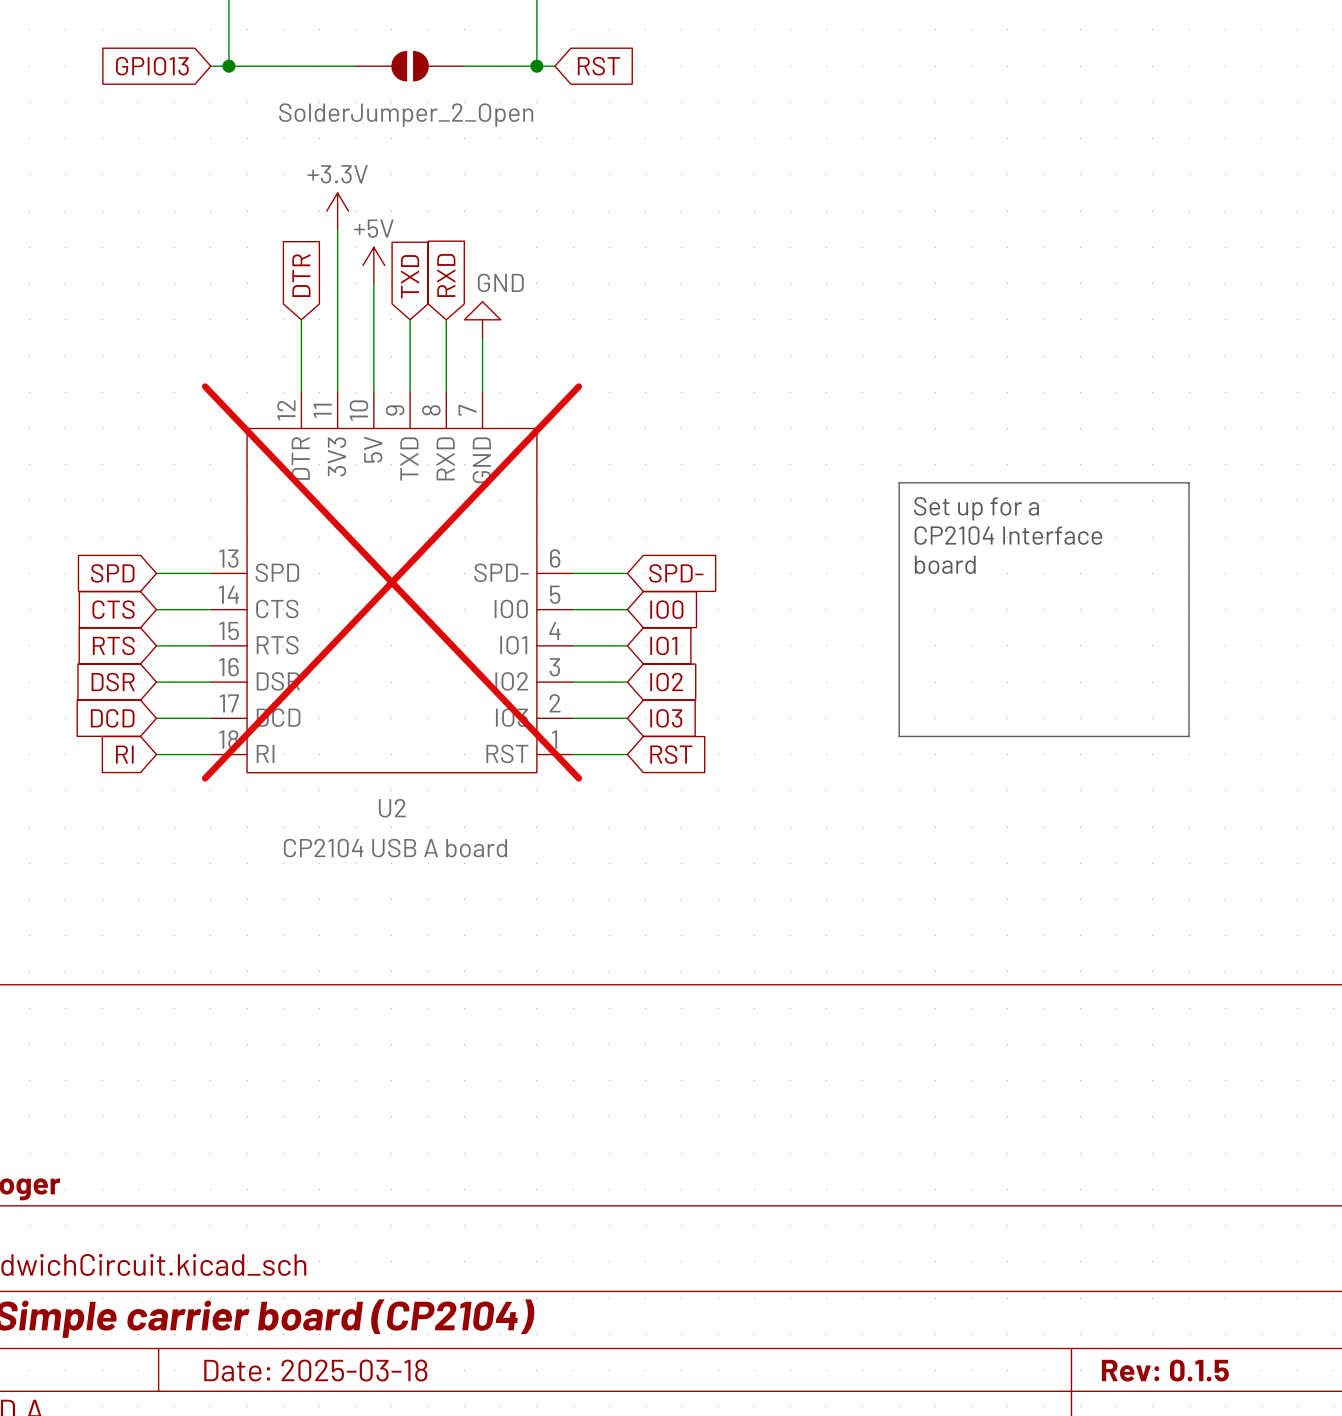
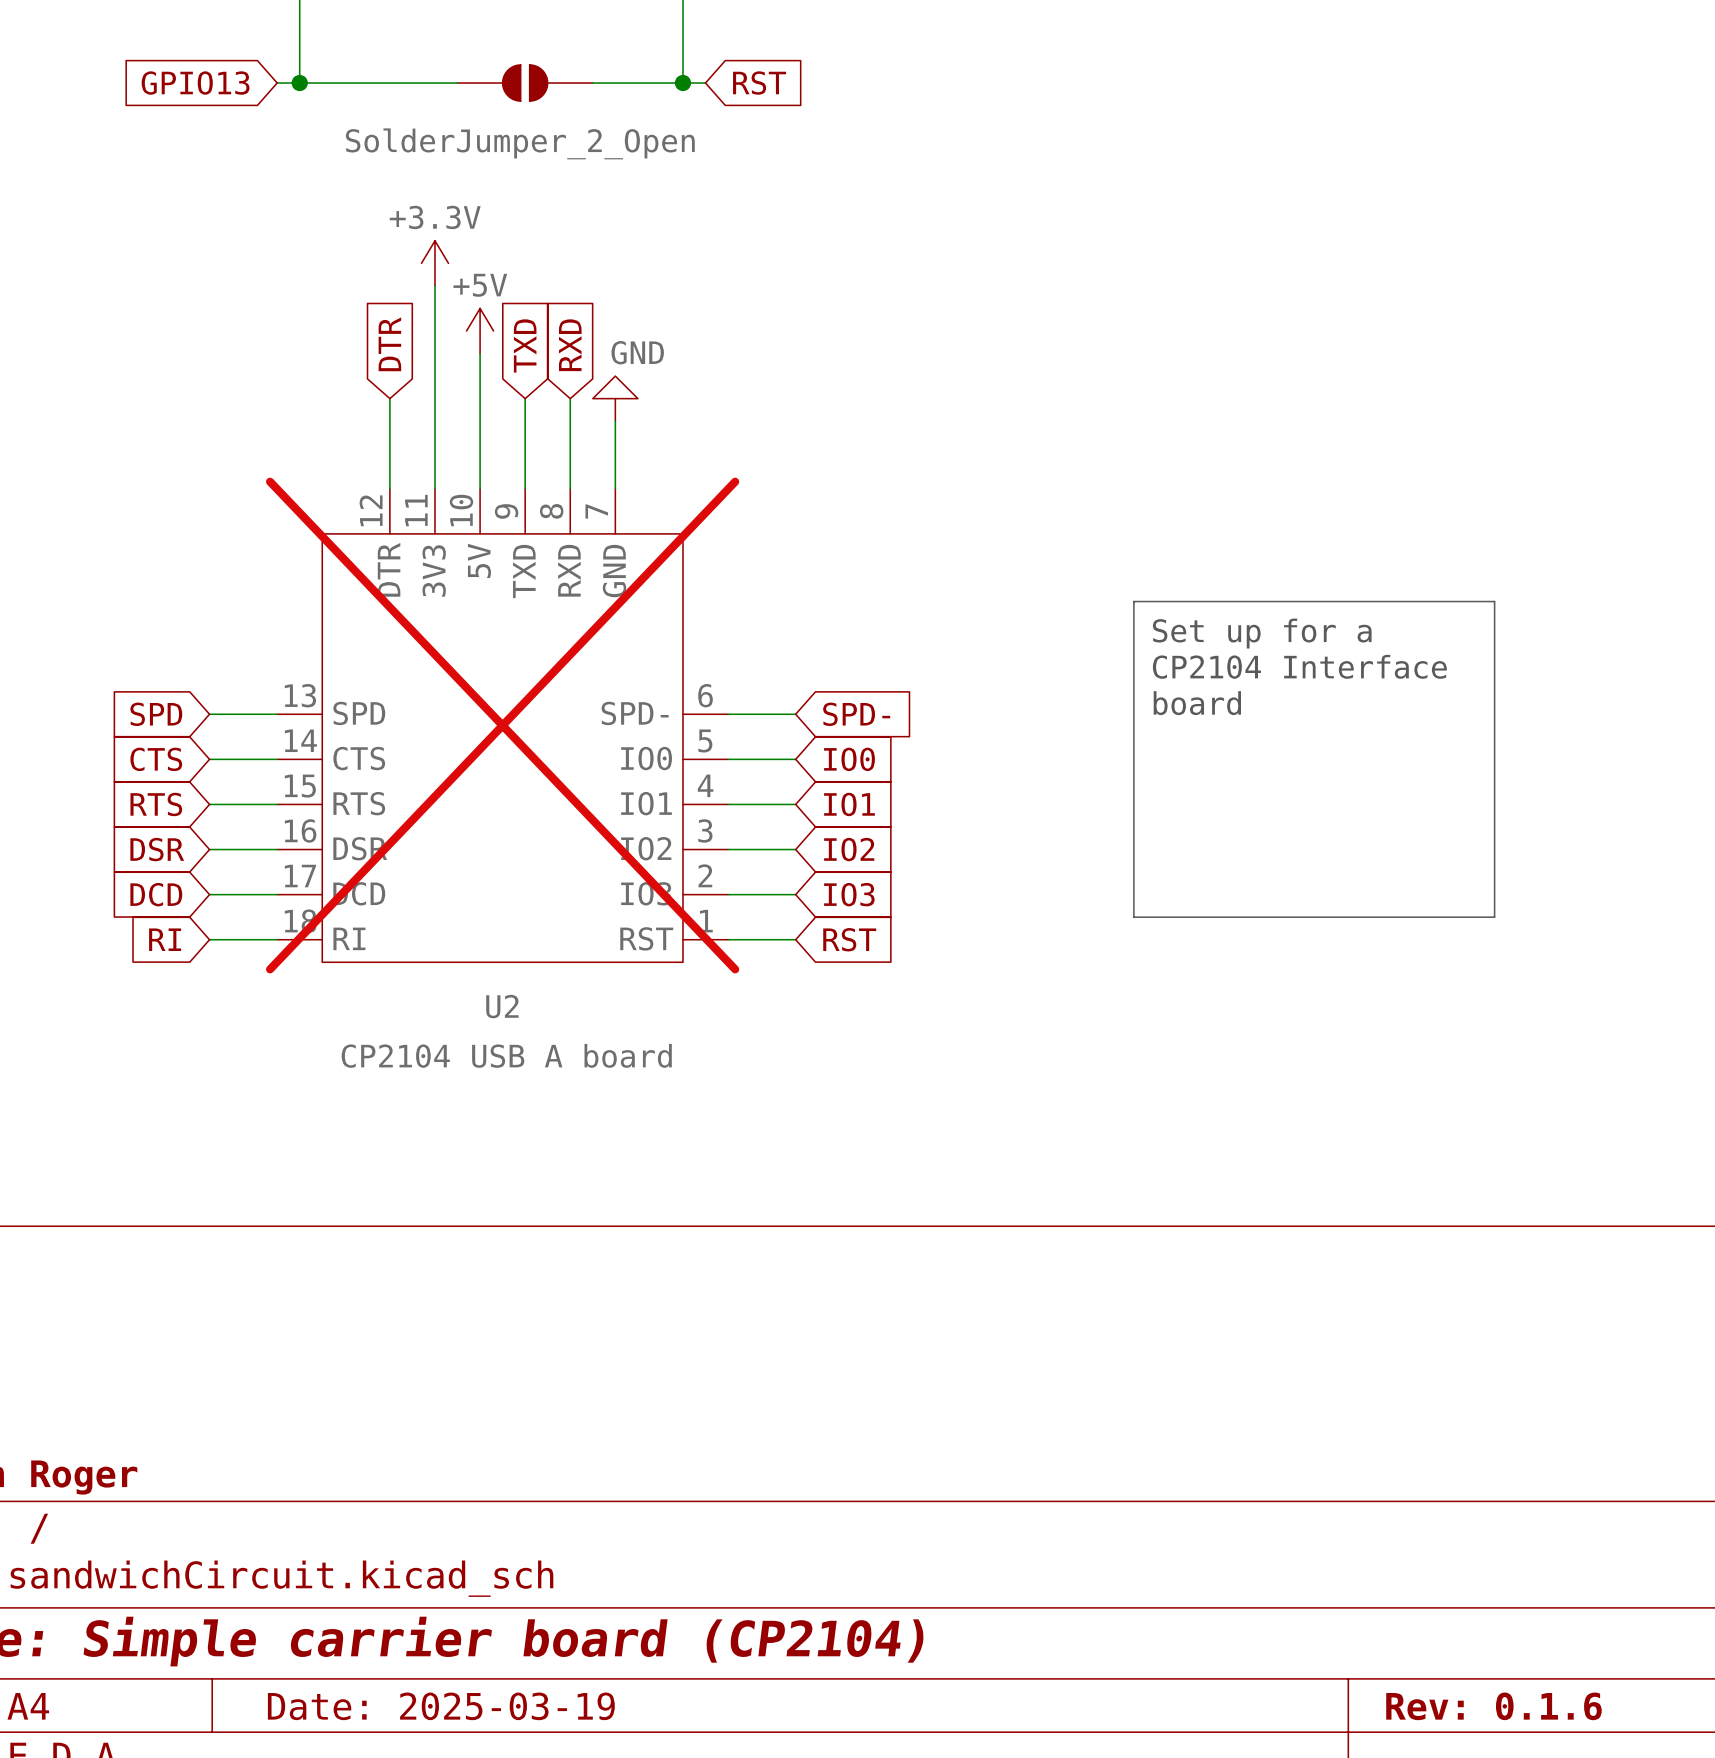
title block: Date: 2025-03-18 (315, 1370) -> Date: 2025-03-19 (441, 1706)
title block: Rev: 0.1.5 (1165, 1370) -> Rev: 0.1.6 (1493, 1706)

